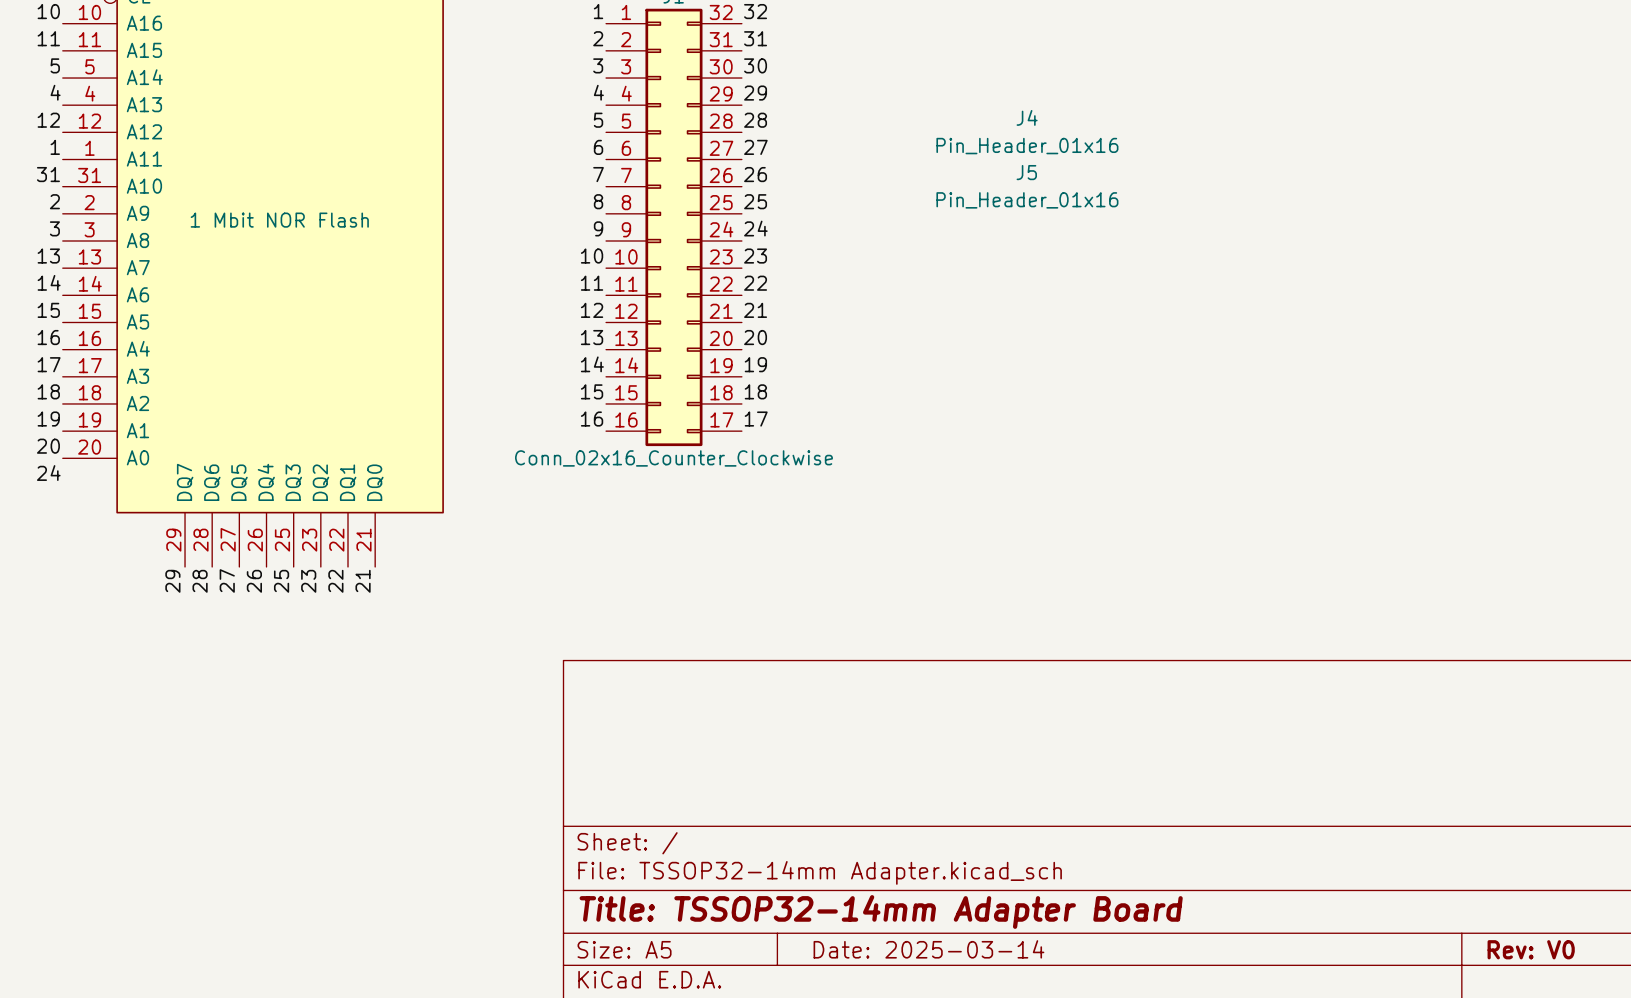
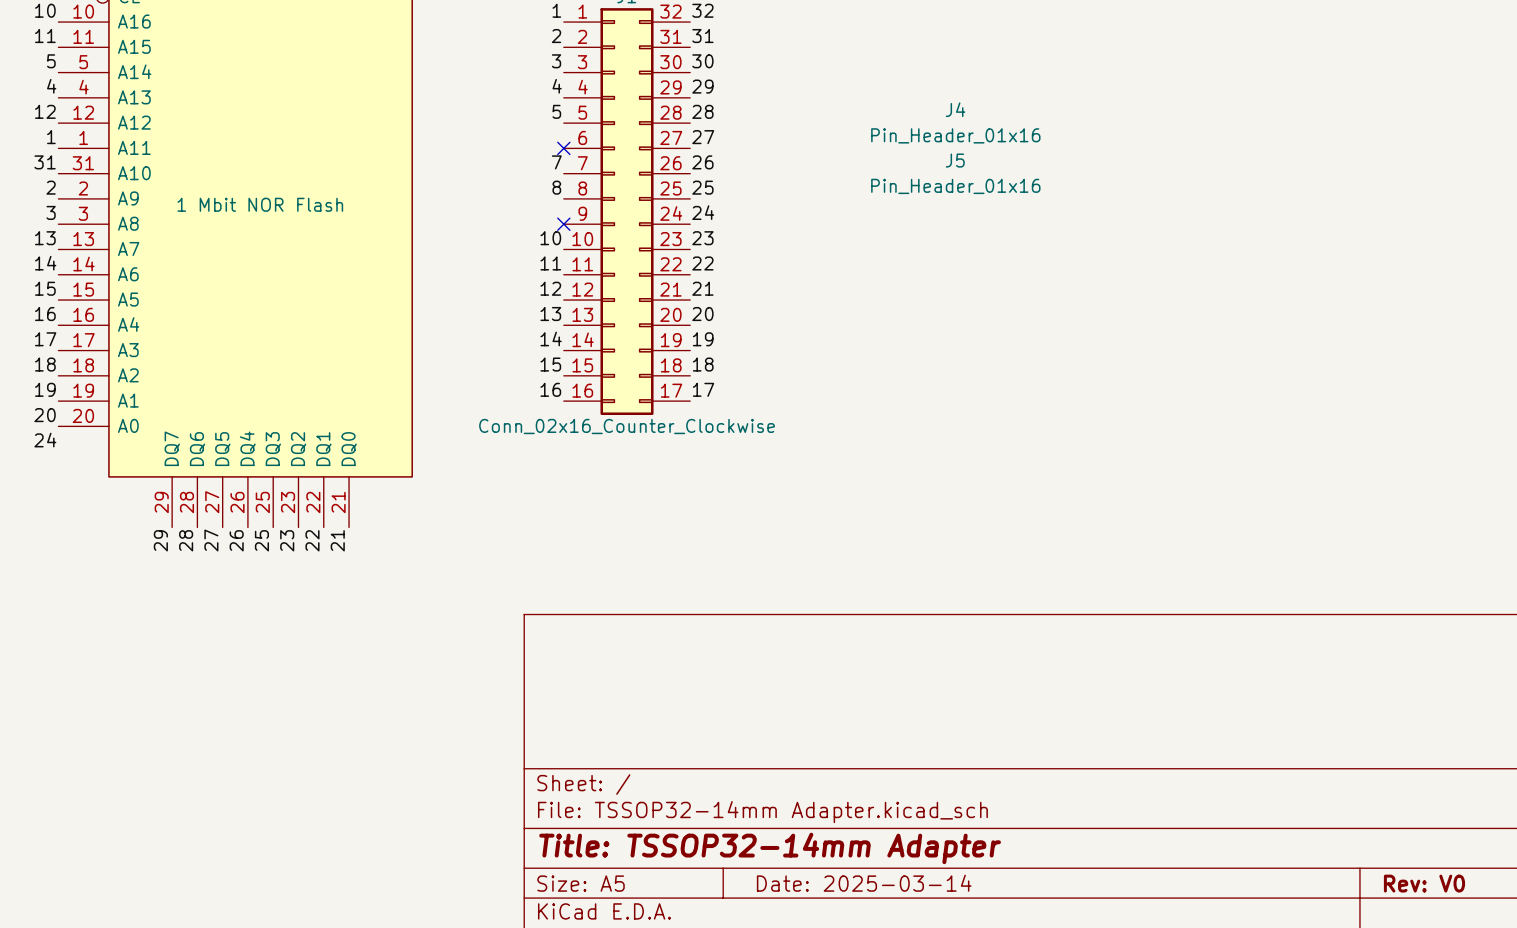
label: 6 (598, 147) -> none
no-connect mark: none -> (563, 148)
label: 9 (598, 228) -> none
no-connect mark: none -> (563, 224)
title block: Title: TSSOP32-14mm Adapter Board (881, 911) -> Title: TSSOP32-14mm Adapter (770, 848)

